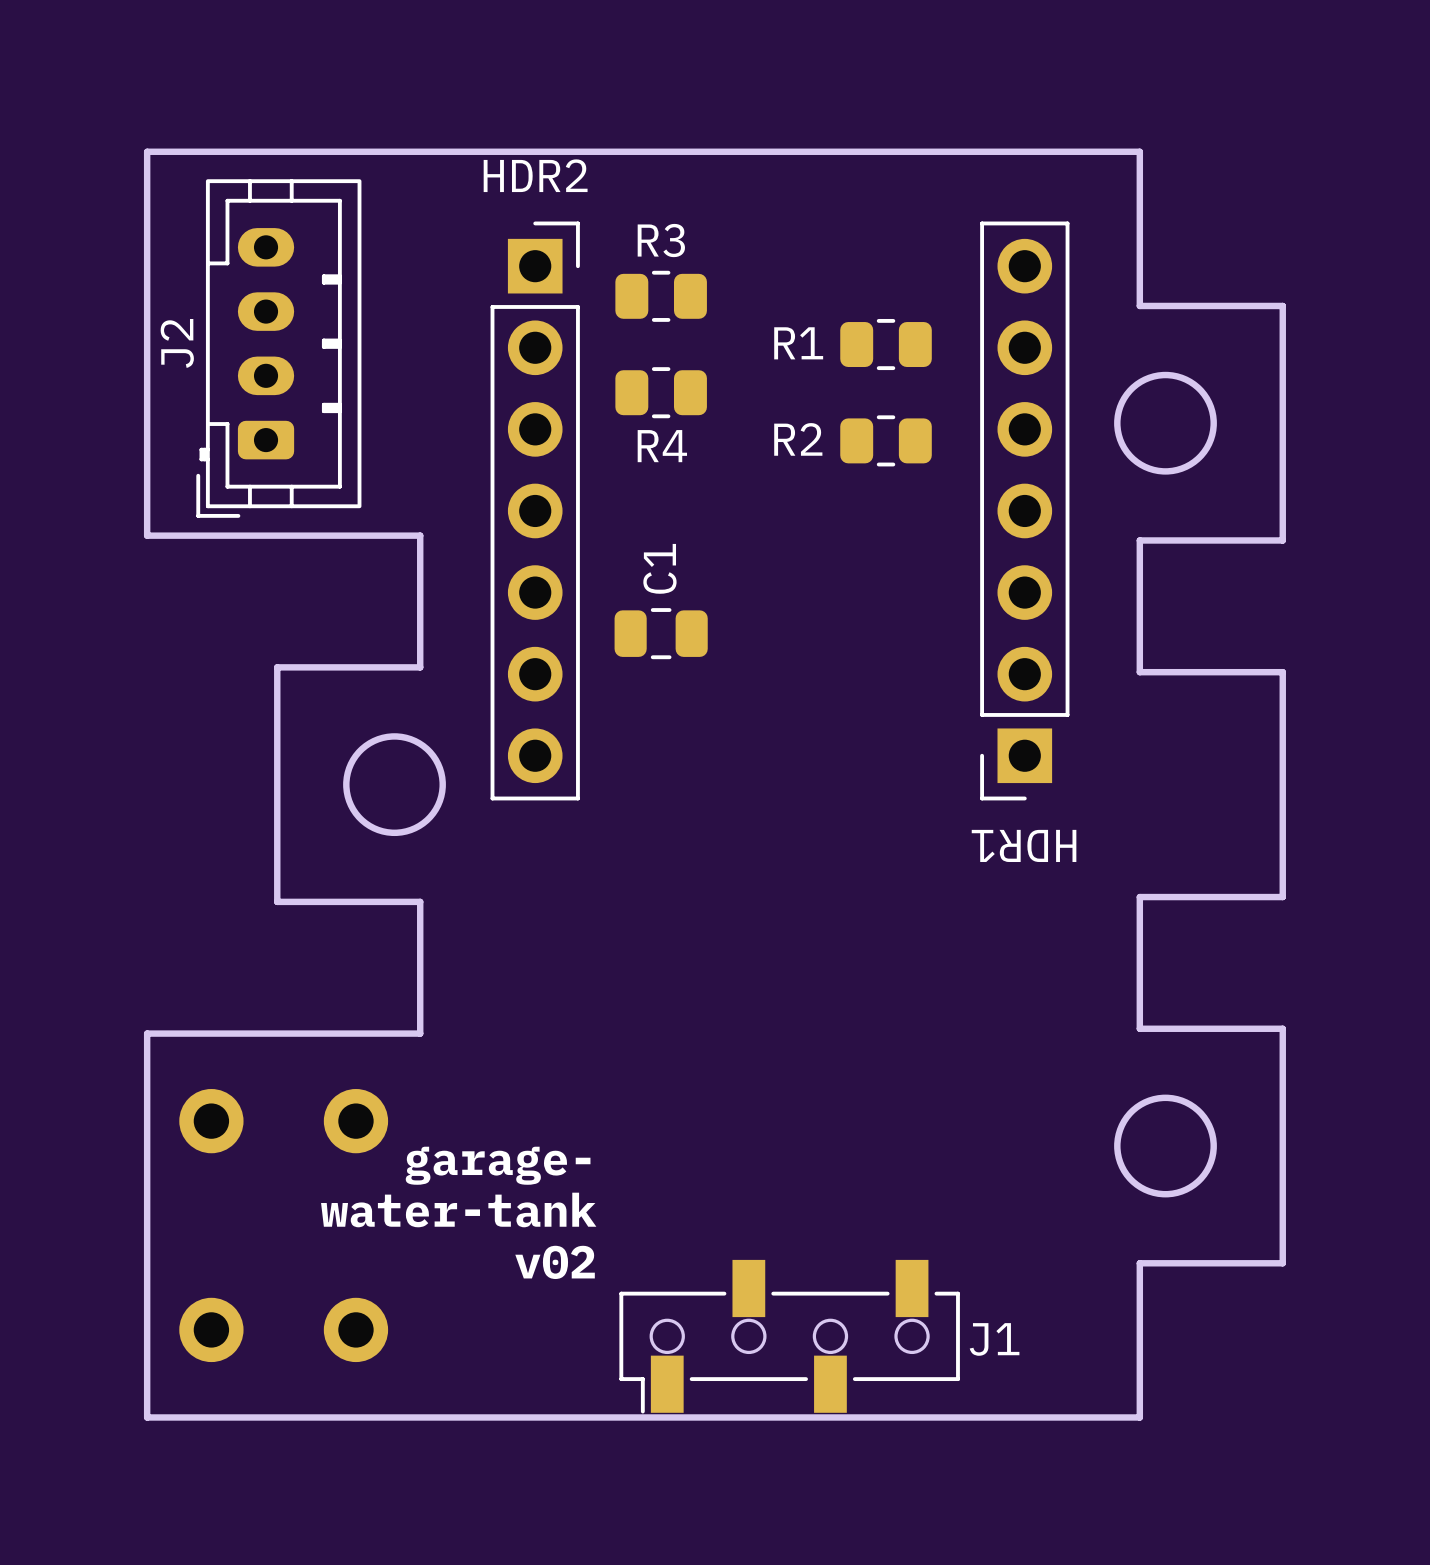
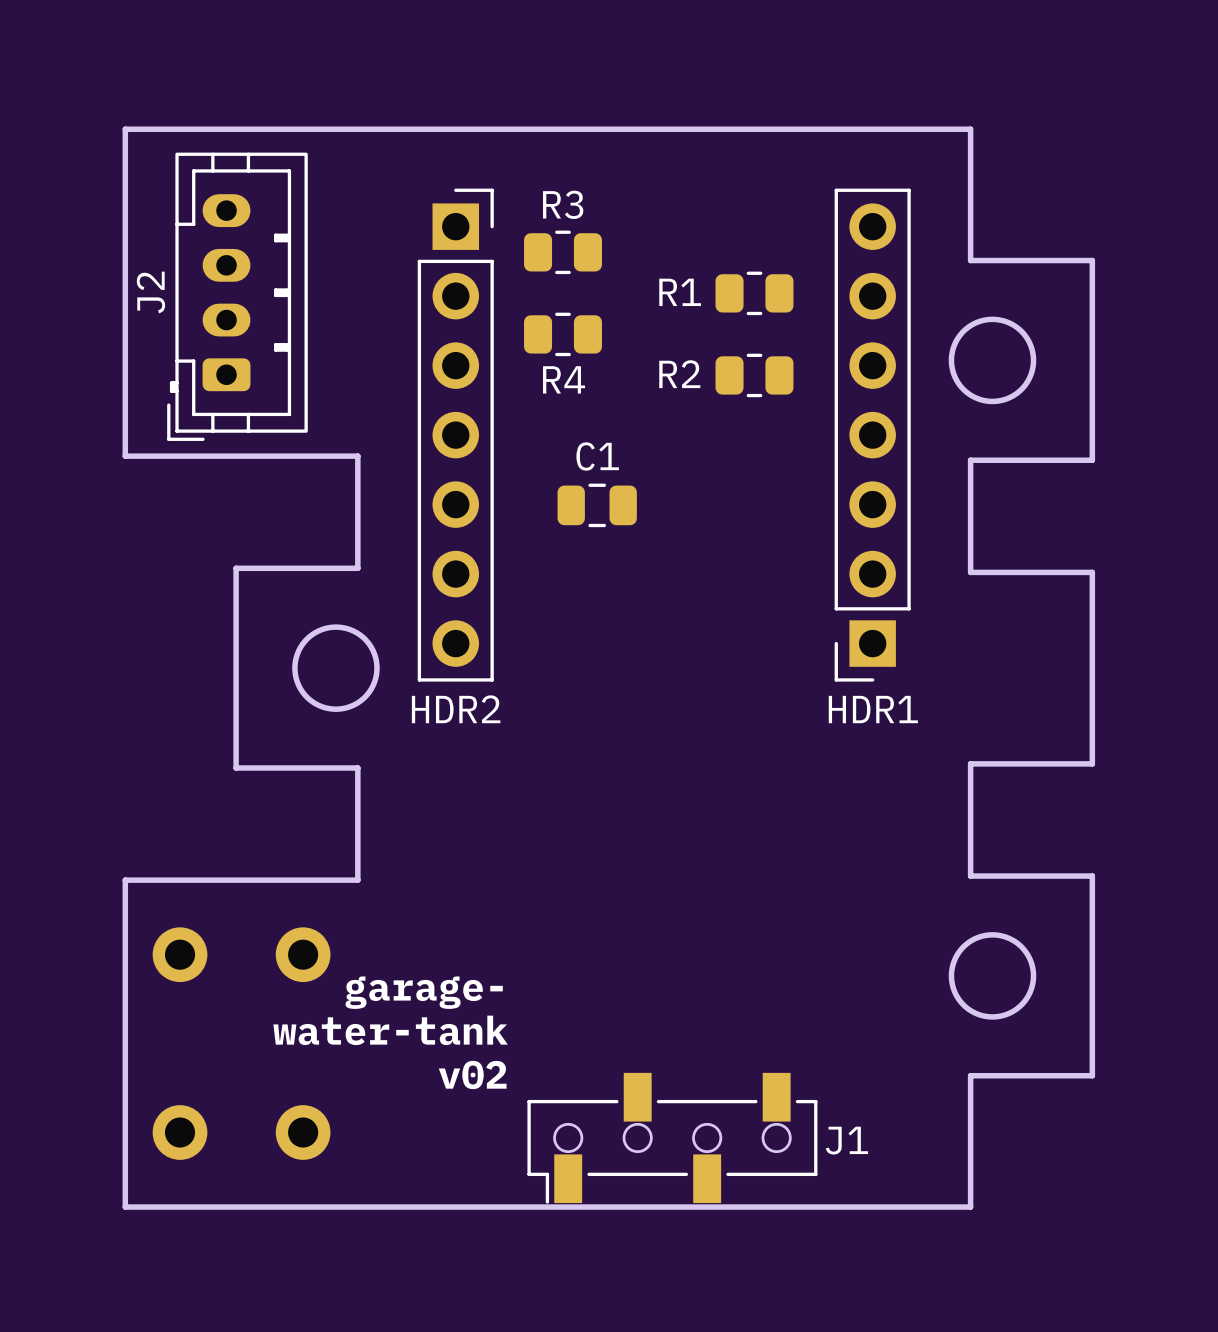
HDR2 name position: HDR2 (535, 175) -> HDR2 (456, 709)
C1 name rotation: 0° (659, 568) -> 90° clockwise (597, 456)
C1 position: (661, 633) -> (597, 505)
HDR1 name rotation: 0° (1024, 845) -> 180° (873, 709)

